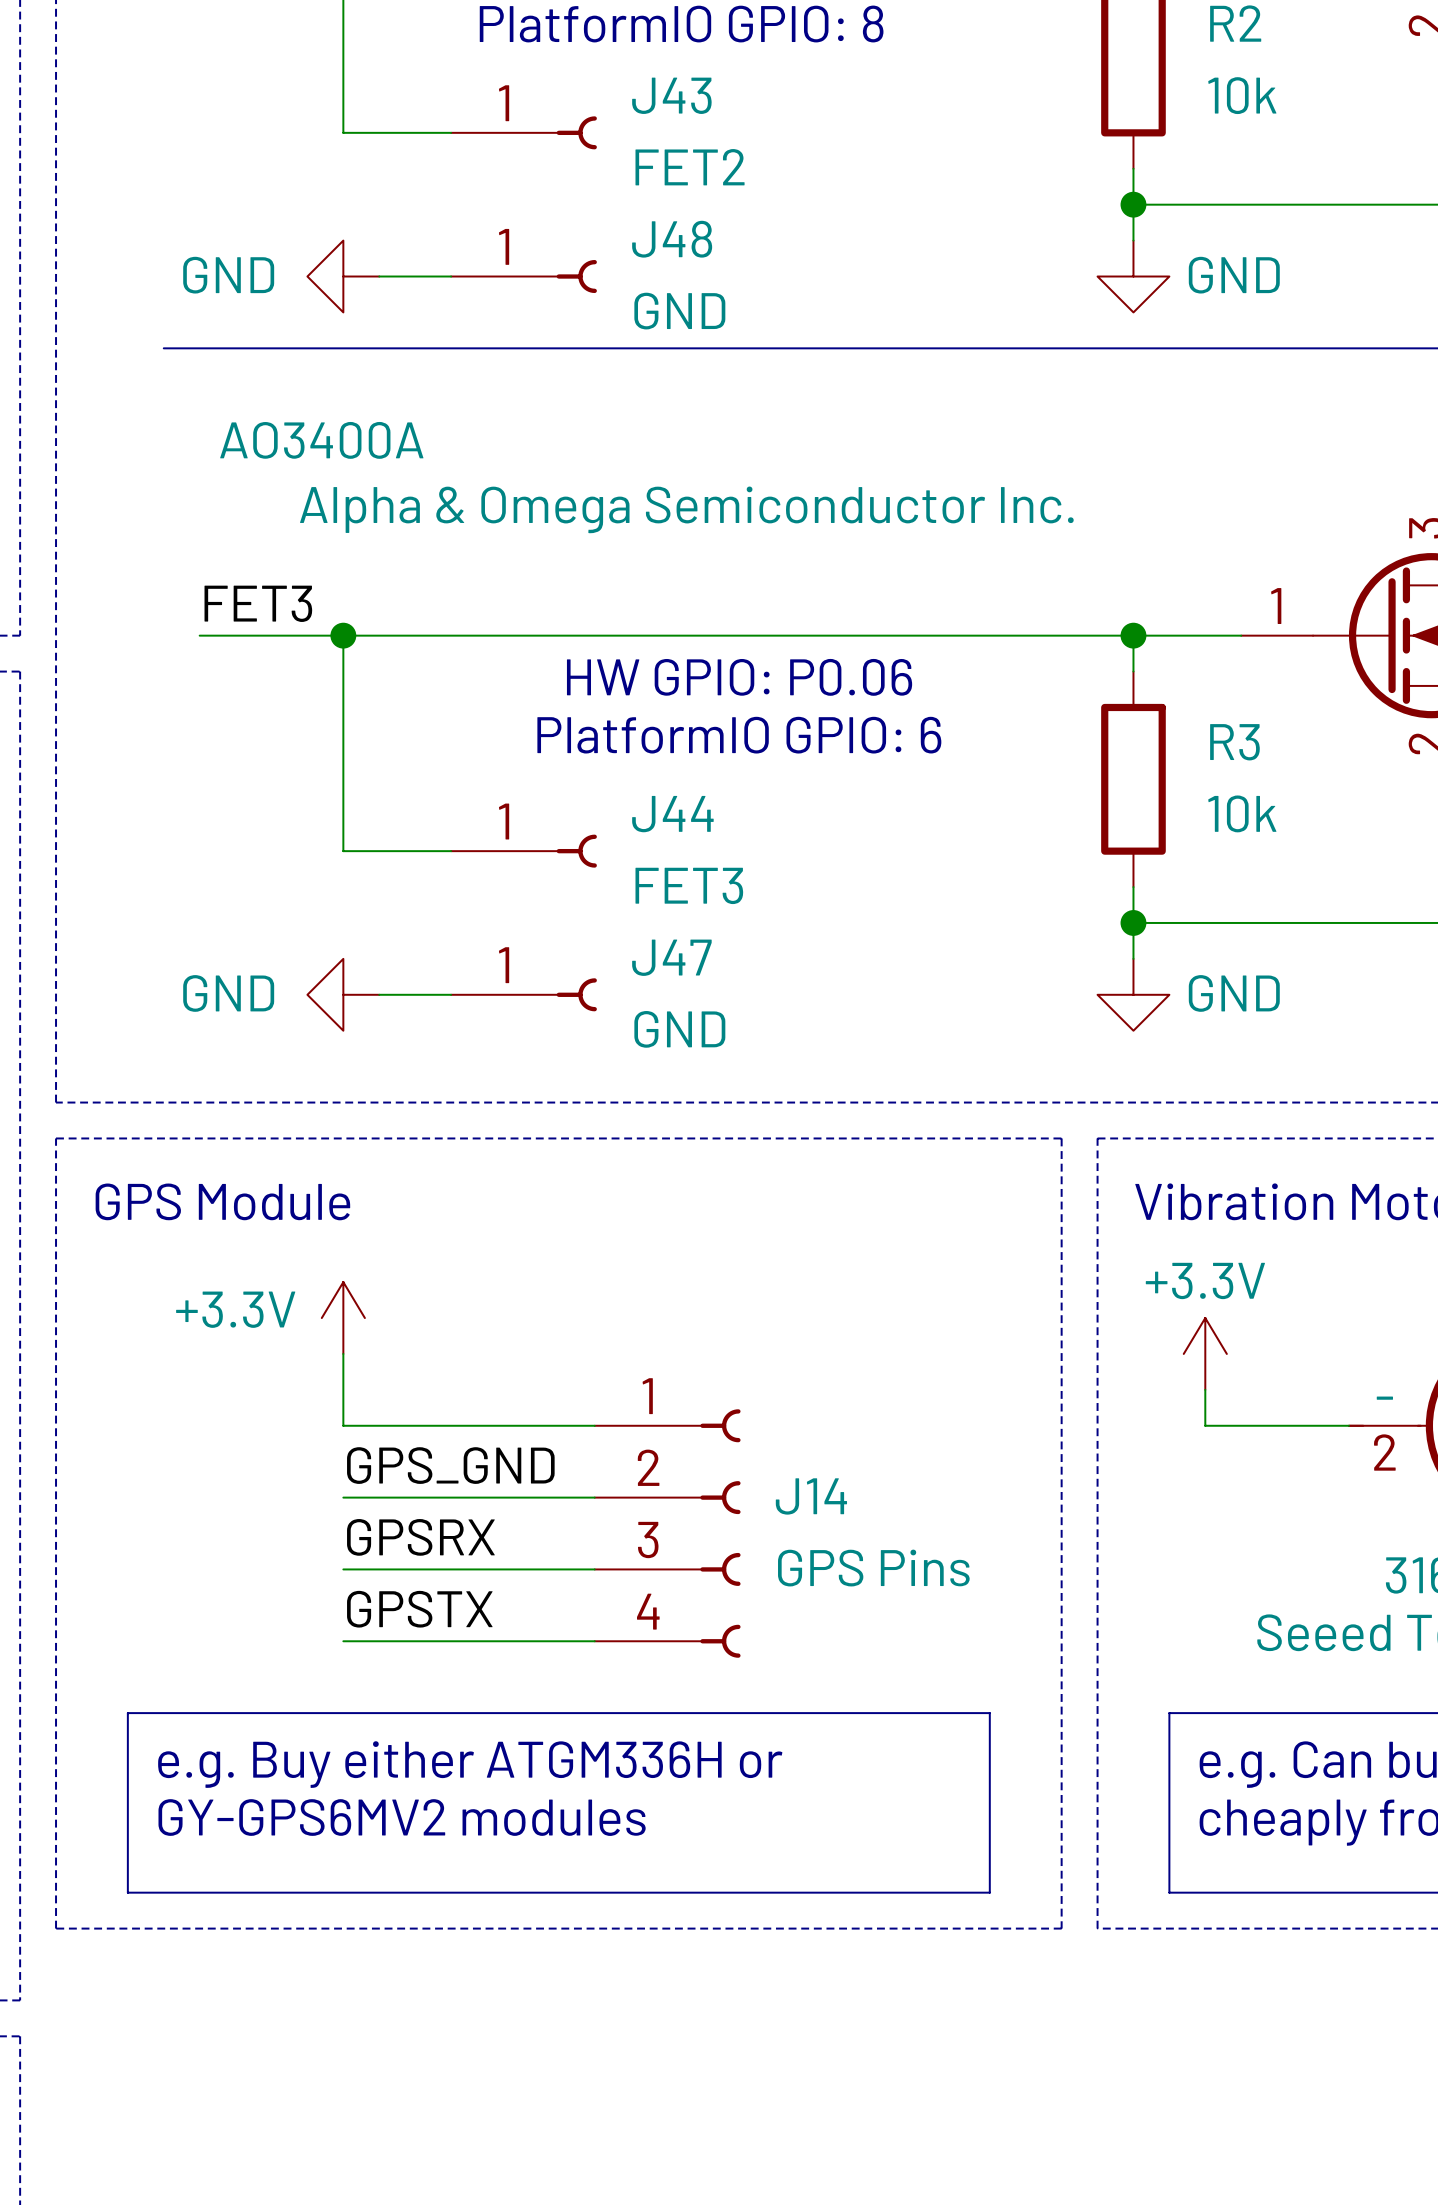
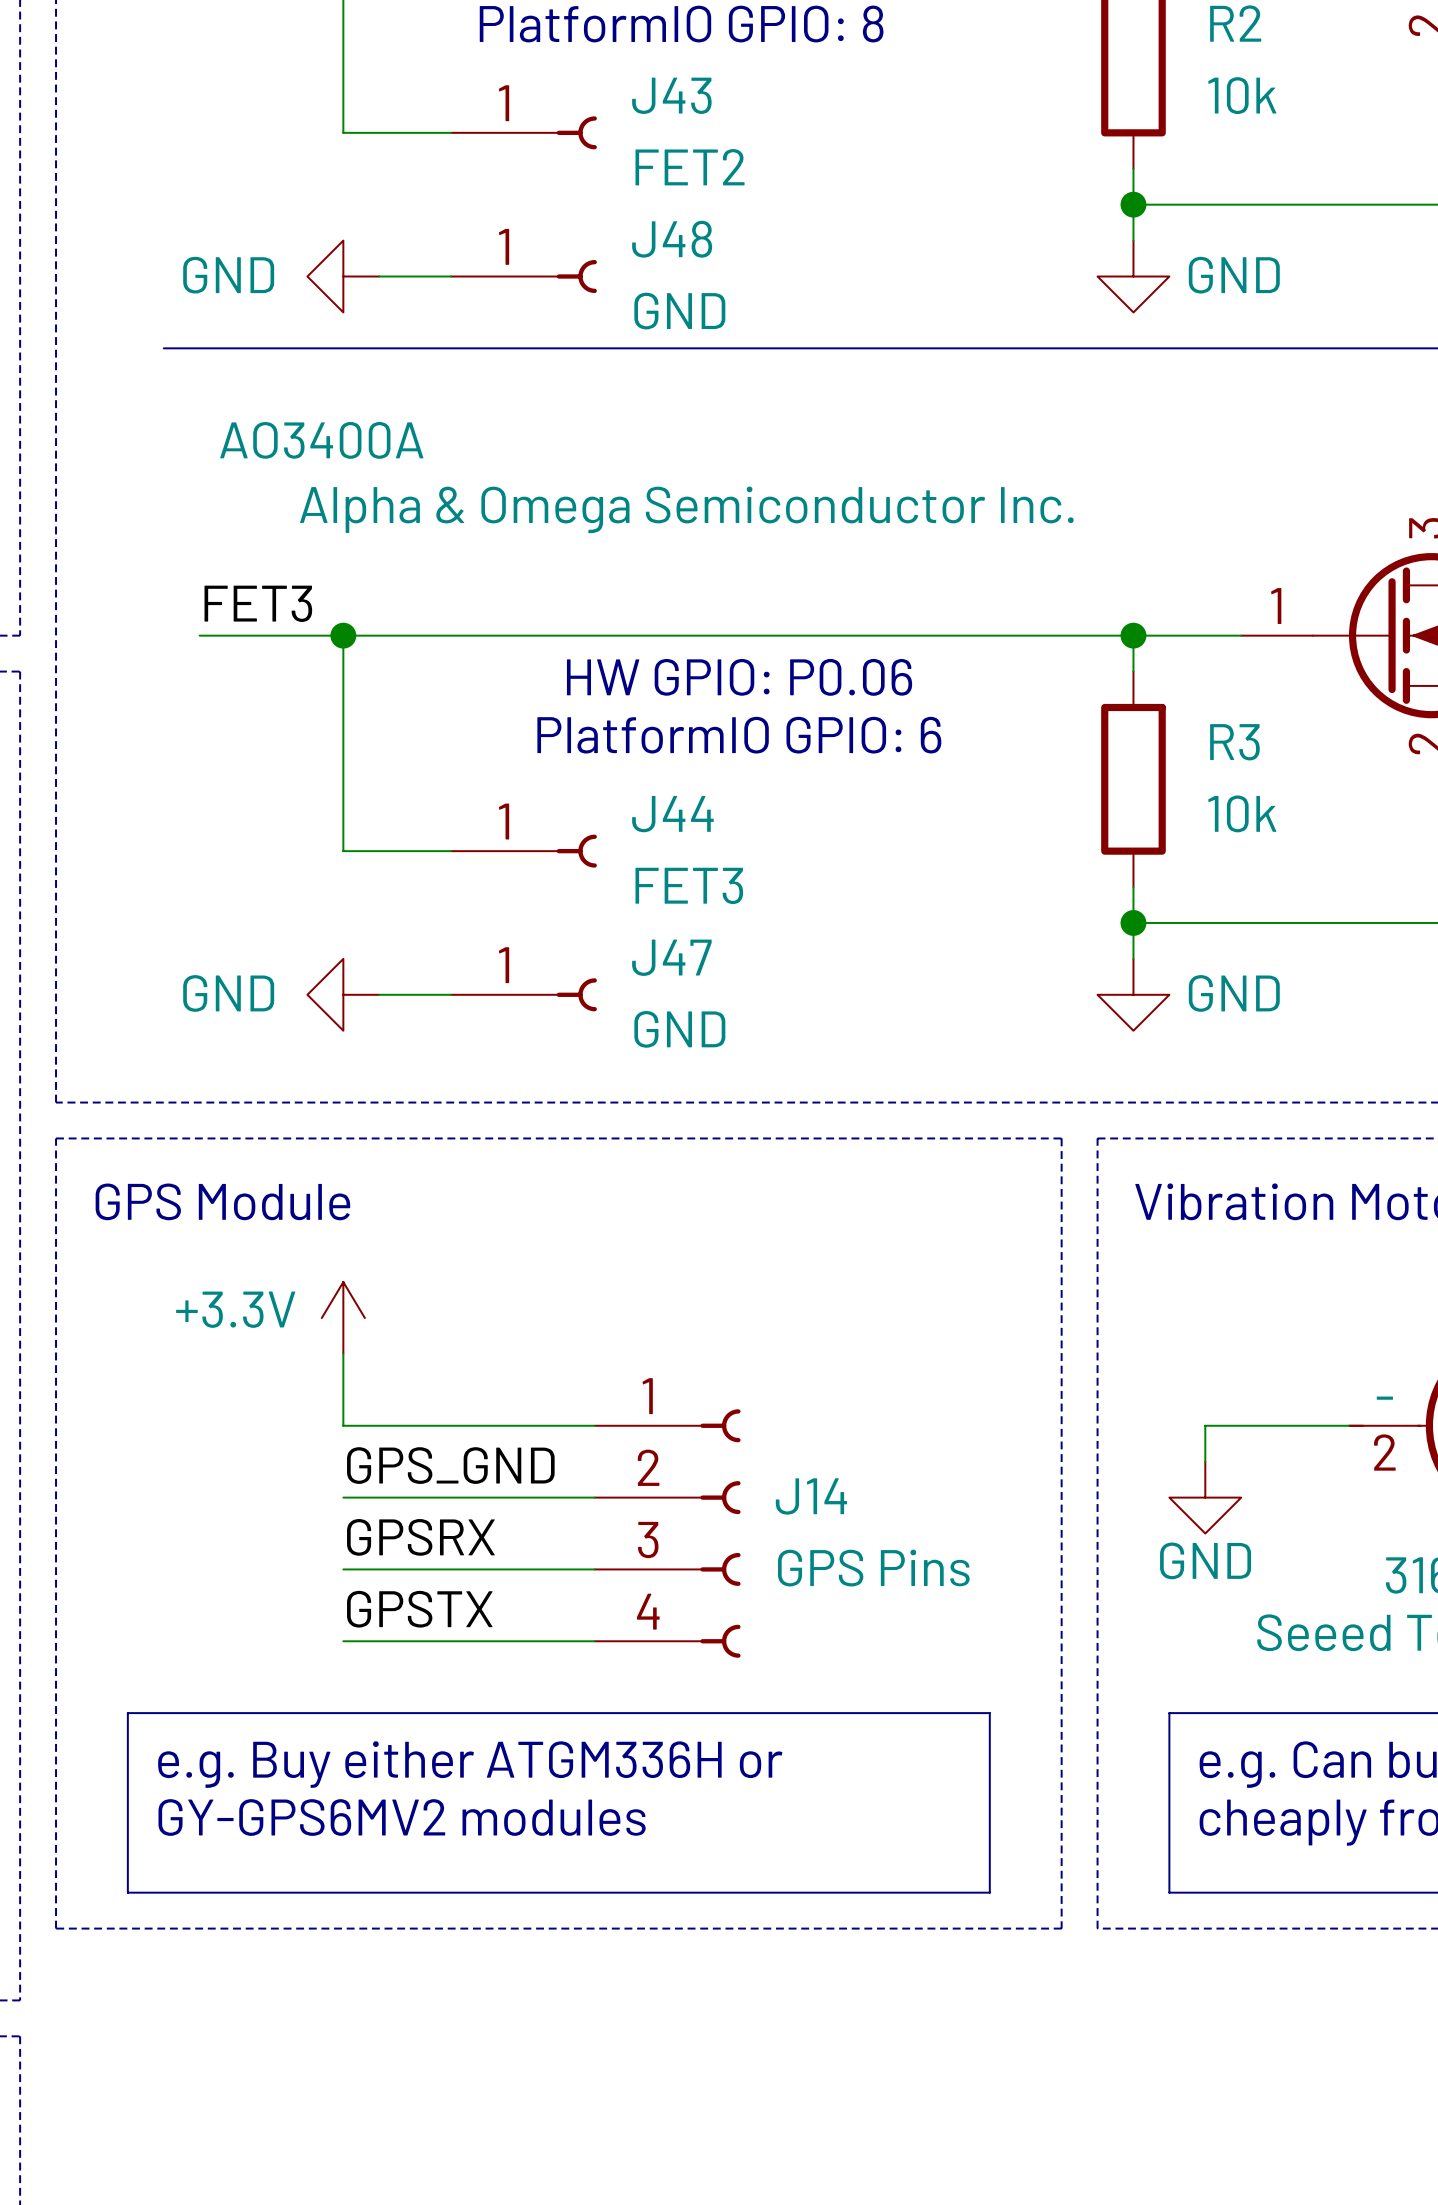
power symbol: +3.3V (1205, 1353) -> none
wire: (1205, 1389) (1205, 1425) -> (1205, 1461) (1205, 1425)
power symbol: none -> GND (1205, 1497)

